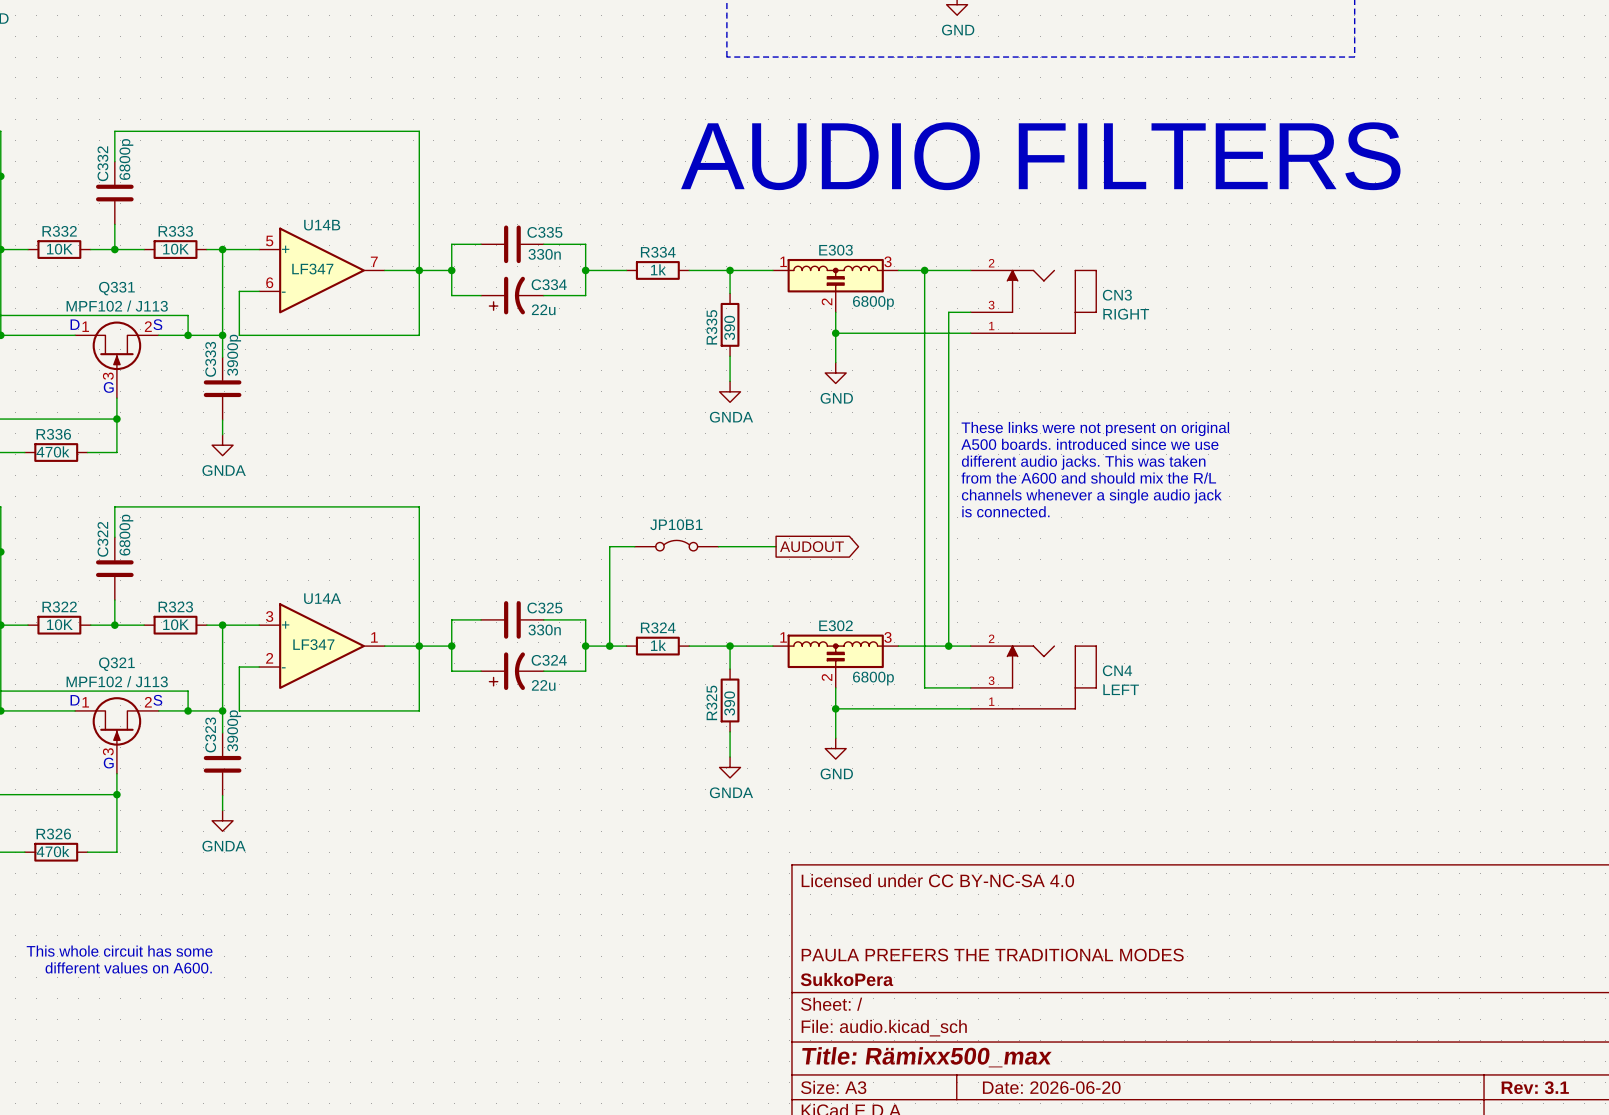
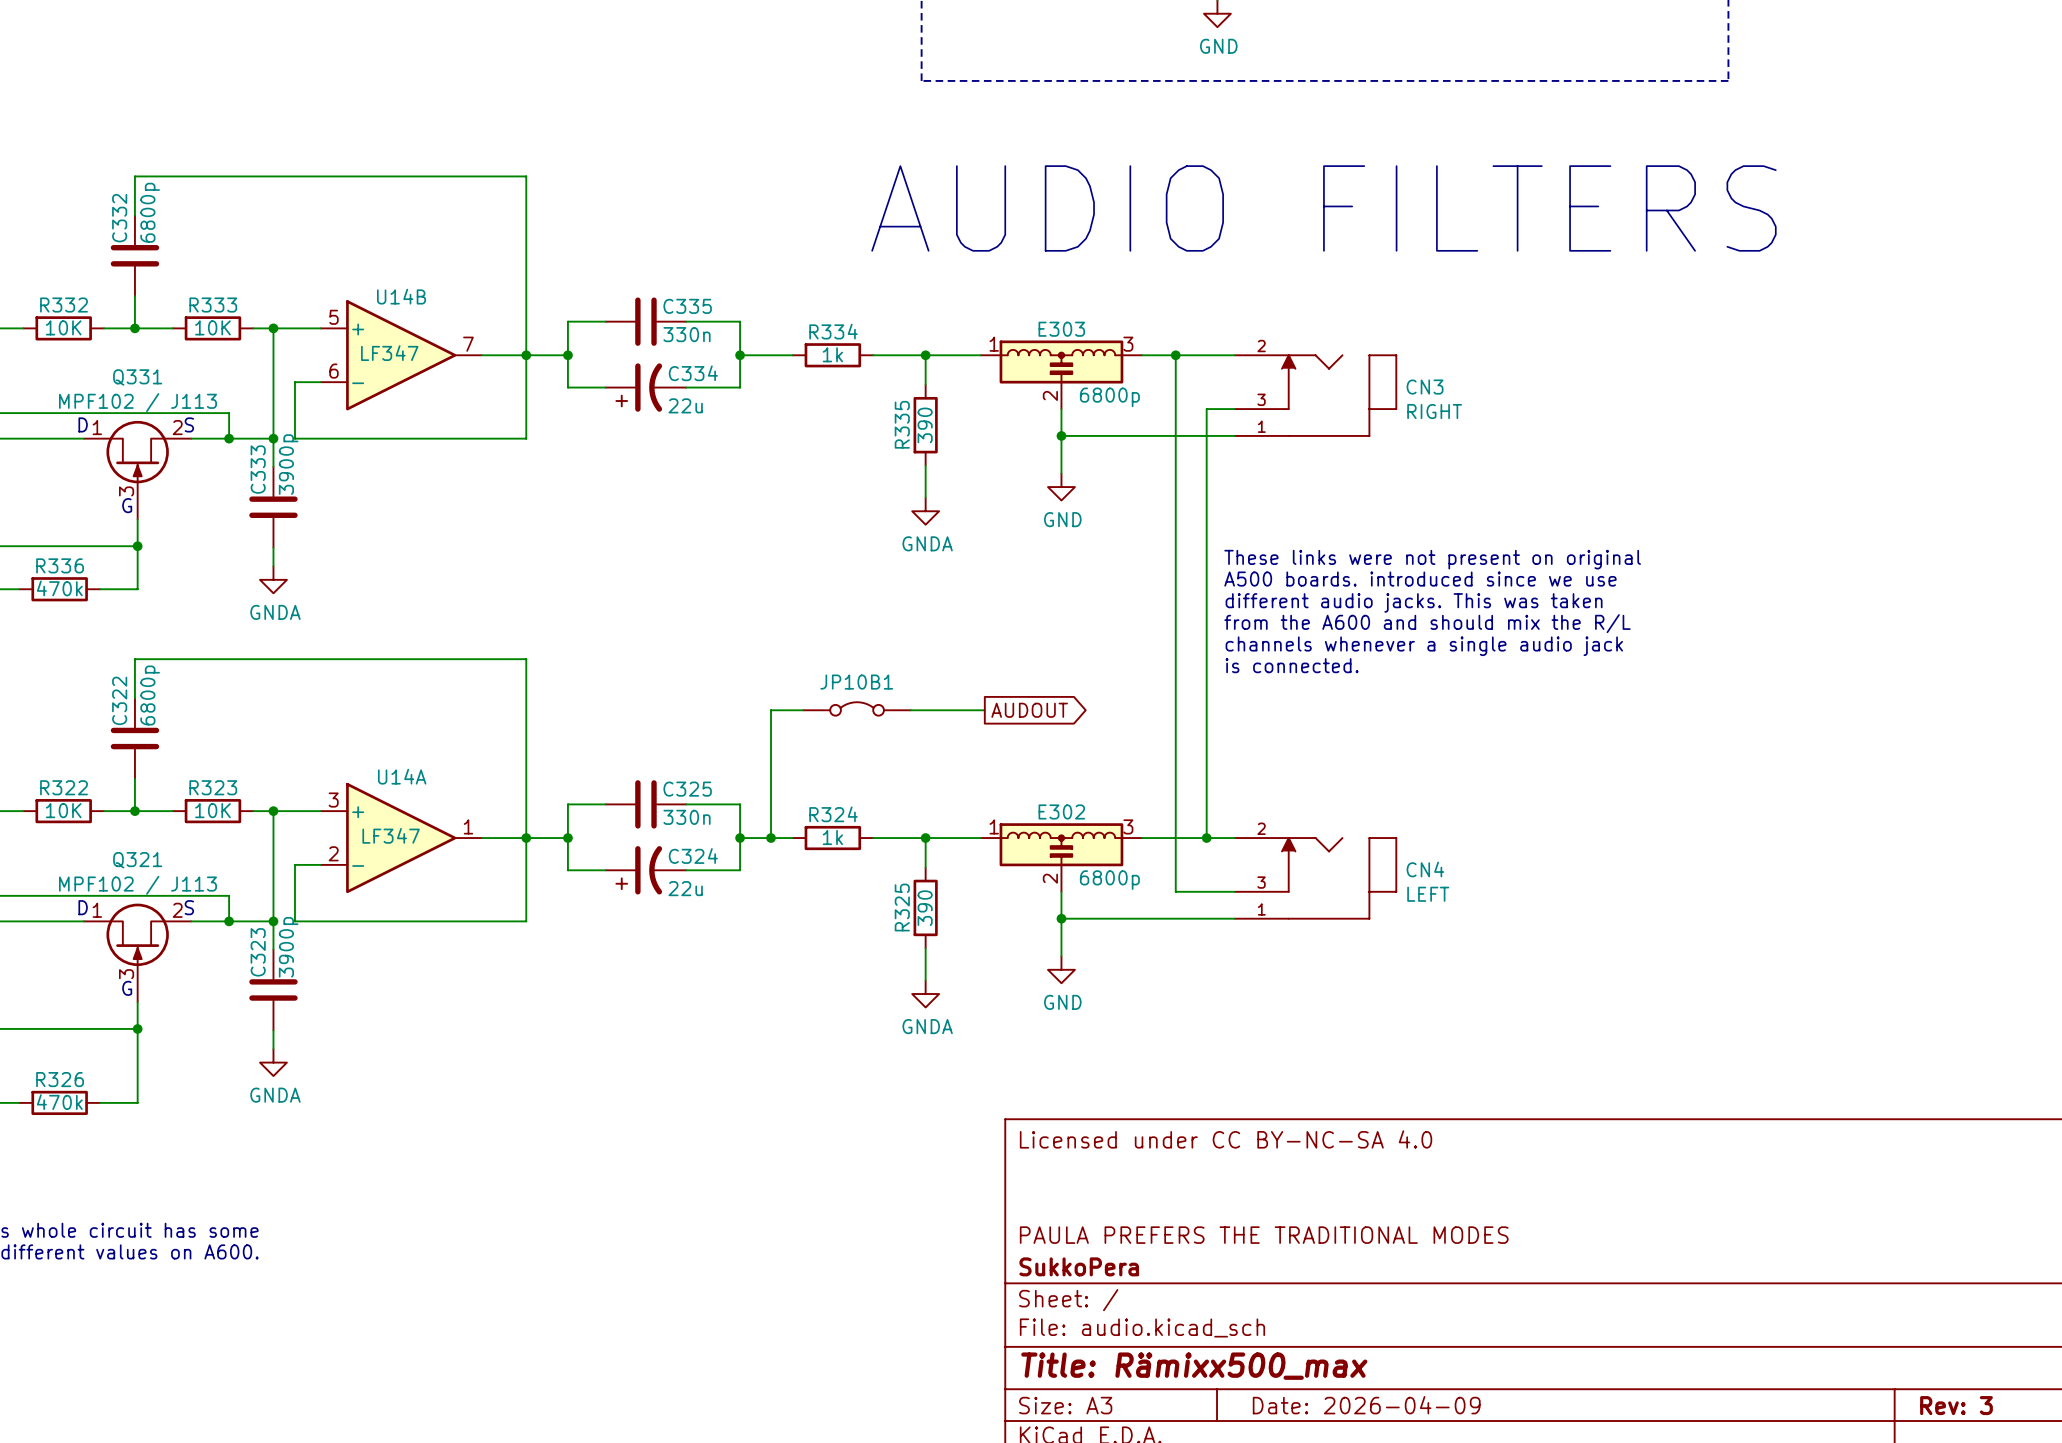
title block: Date: 2026-06-20 (1051, 1087) -> Date: 2026-04-09 (1366, 1405)
title block: Rev: 3.1 (1535, 1087) -> Rev: 3 (1956, 1405)

